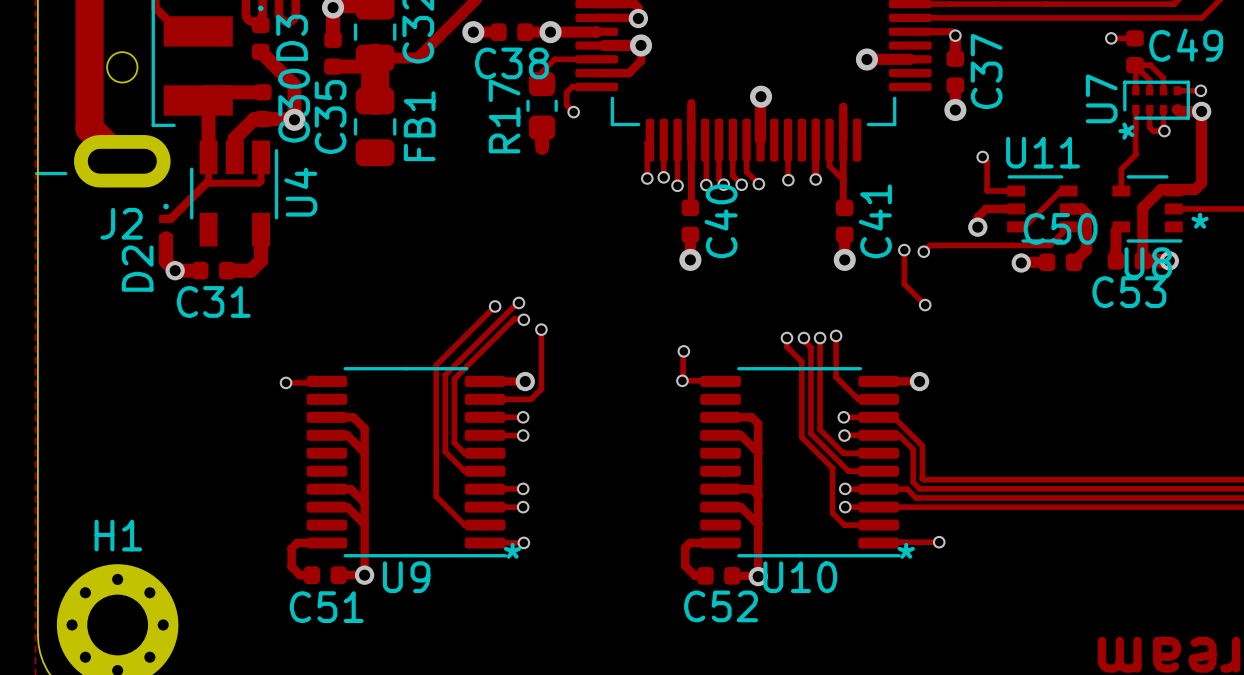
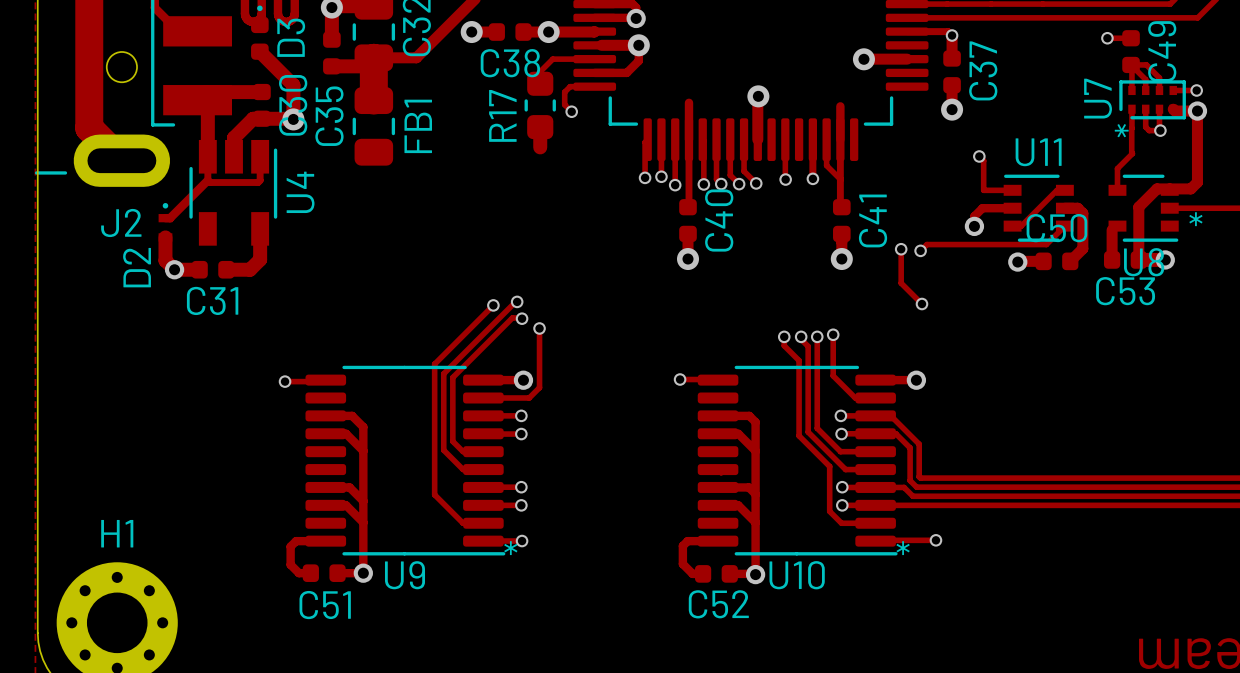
C49 name rotation: 0° (1186, 45) -> 90° counterclockwise (1162, 51)
via: (683, 351) -> none
track: (683, 352) (682, 380) -> none

